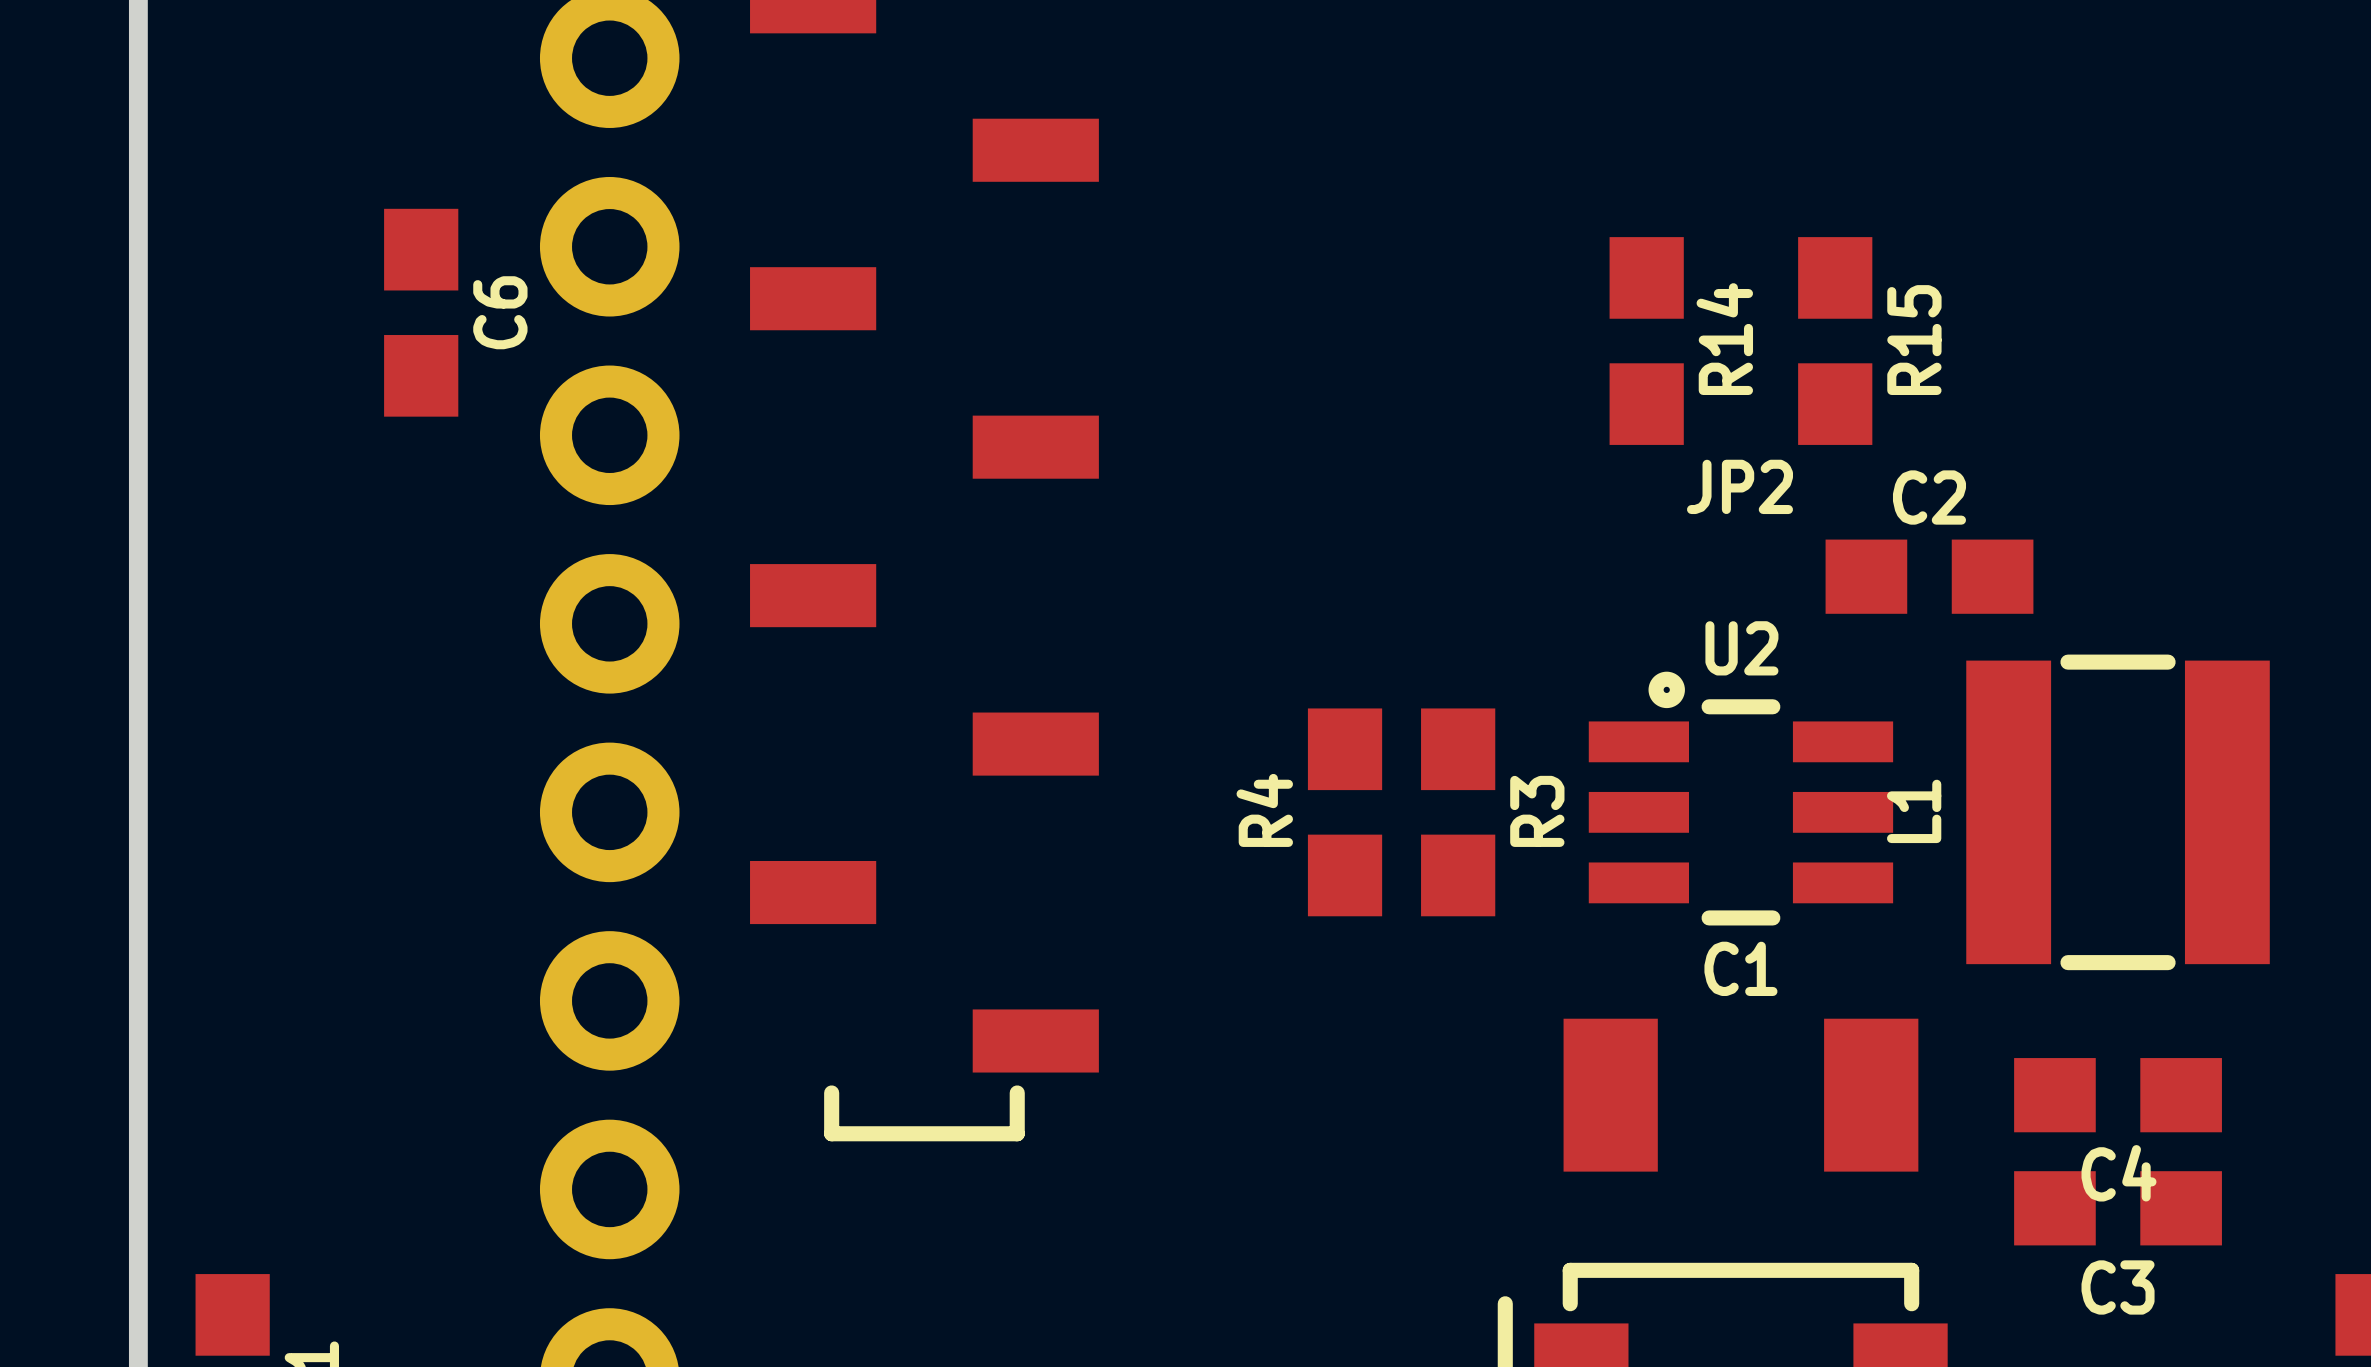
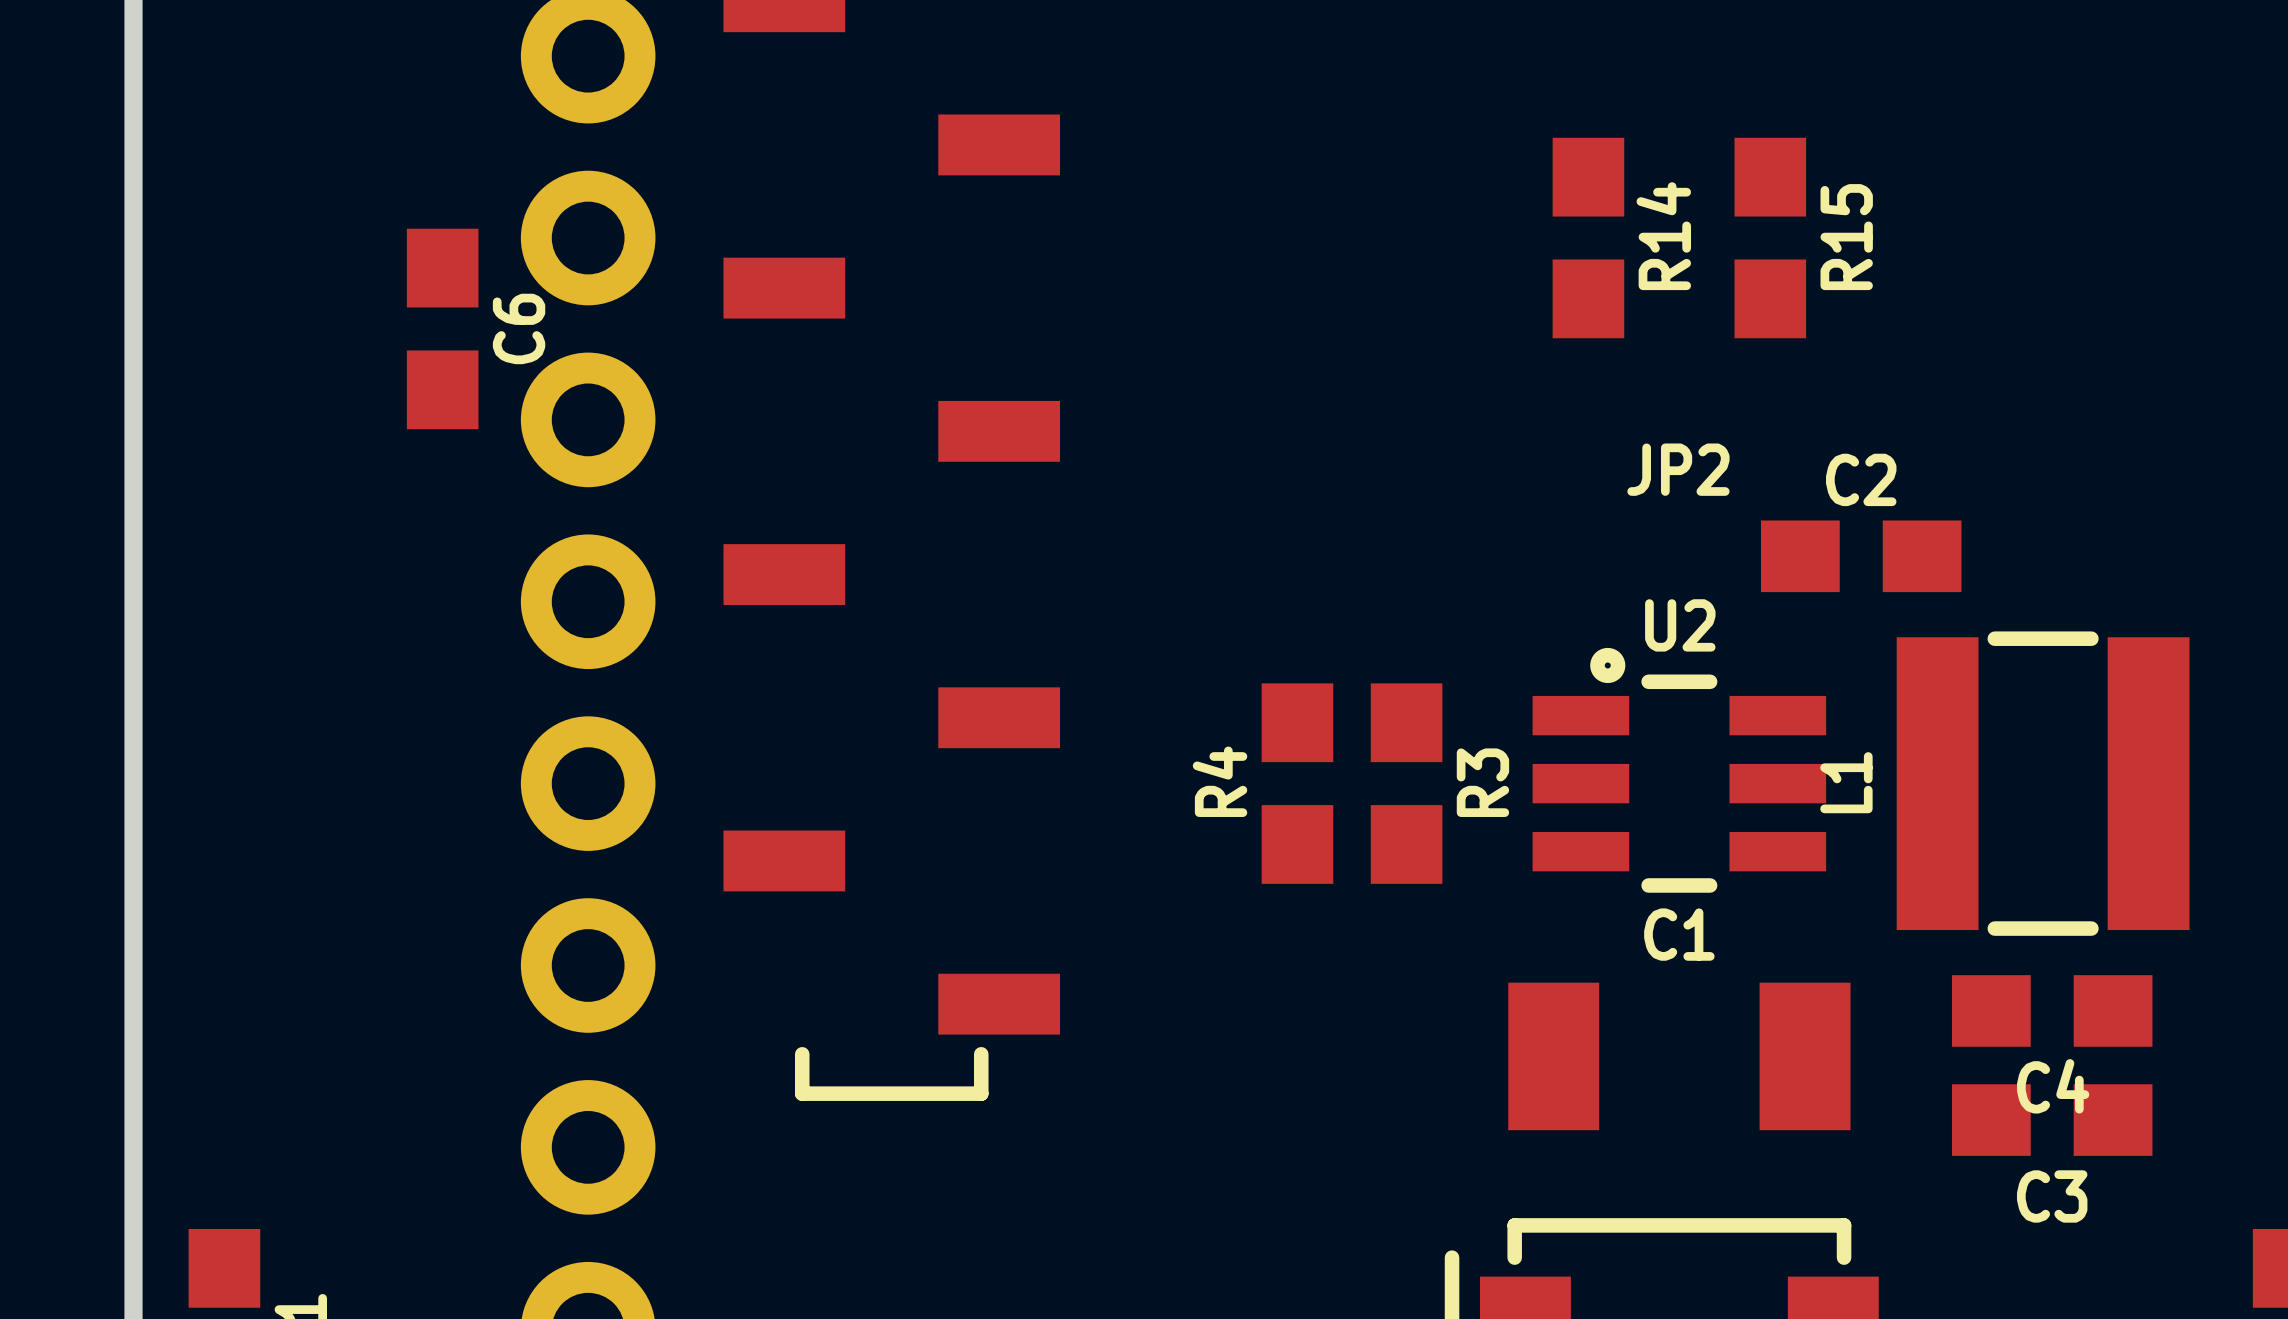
C6 position: (421, 312) -> (442, 328)
R14 position: (1646, 341) -> (1588, 238)
R15 position: (1835, 341) -> (1770, 238)
C4 position: (2118, 1095) -> (2052, 1010)
C3 position: (2118, 1208) -> (2052, 1120)

